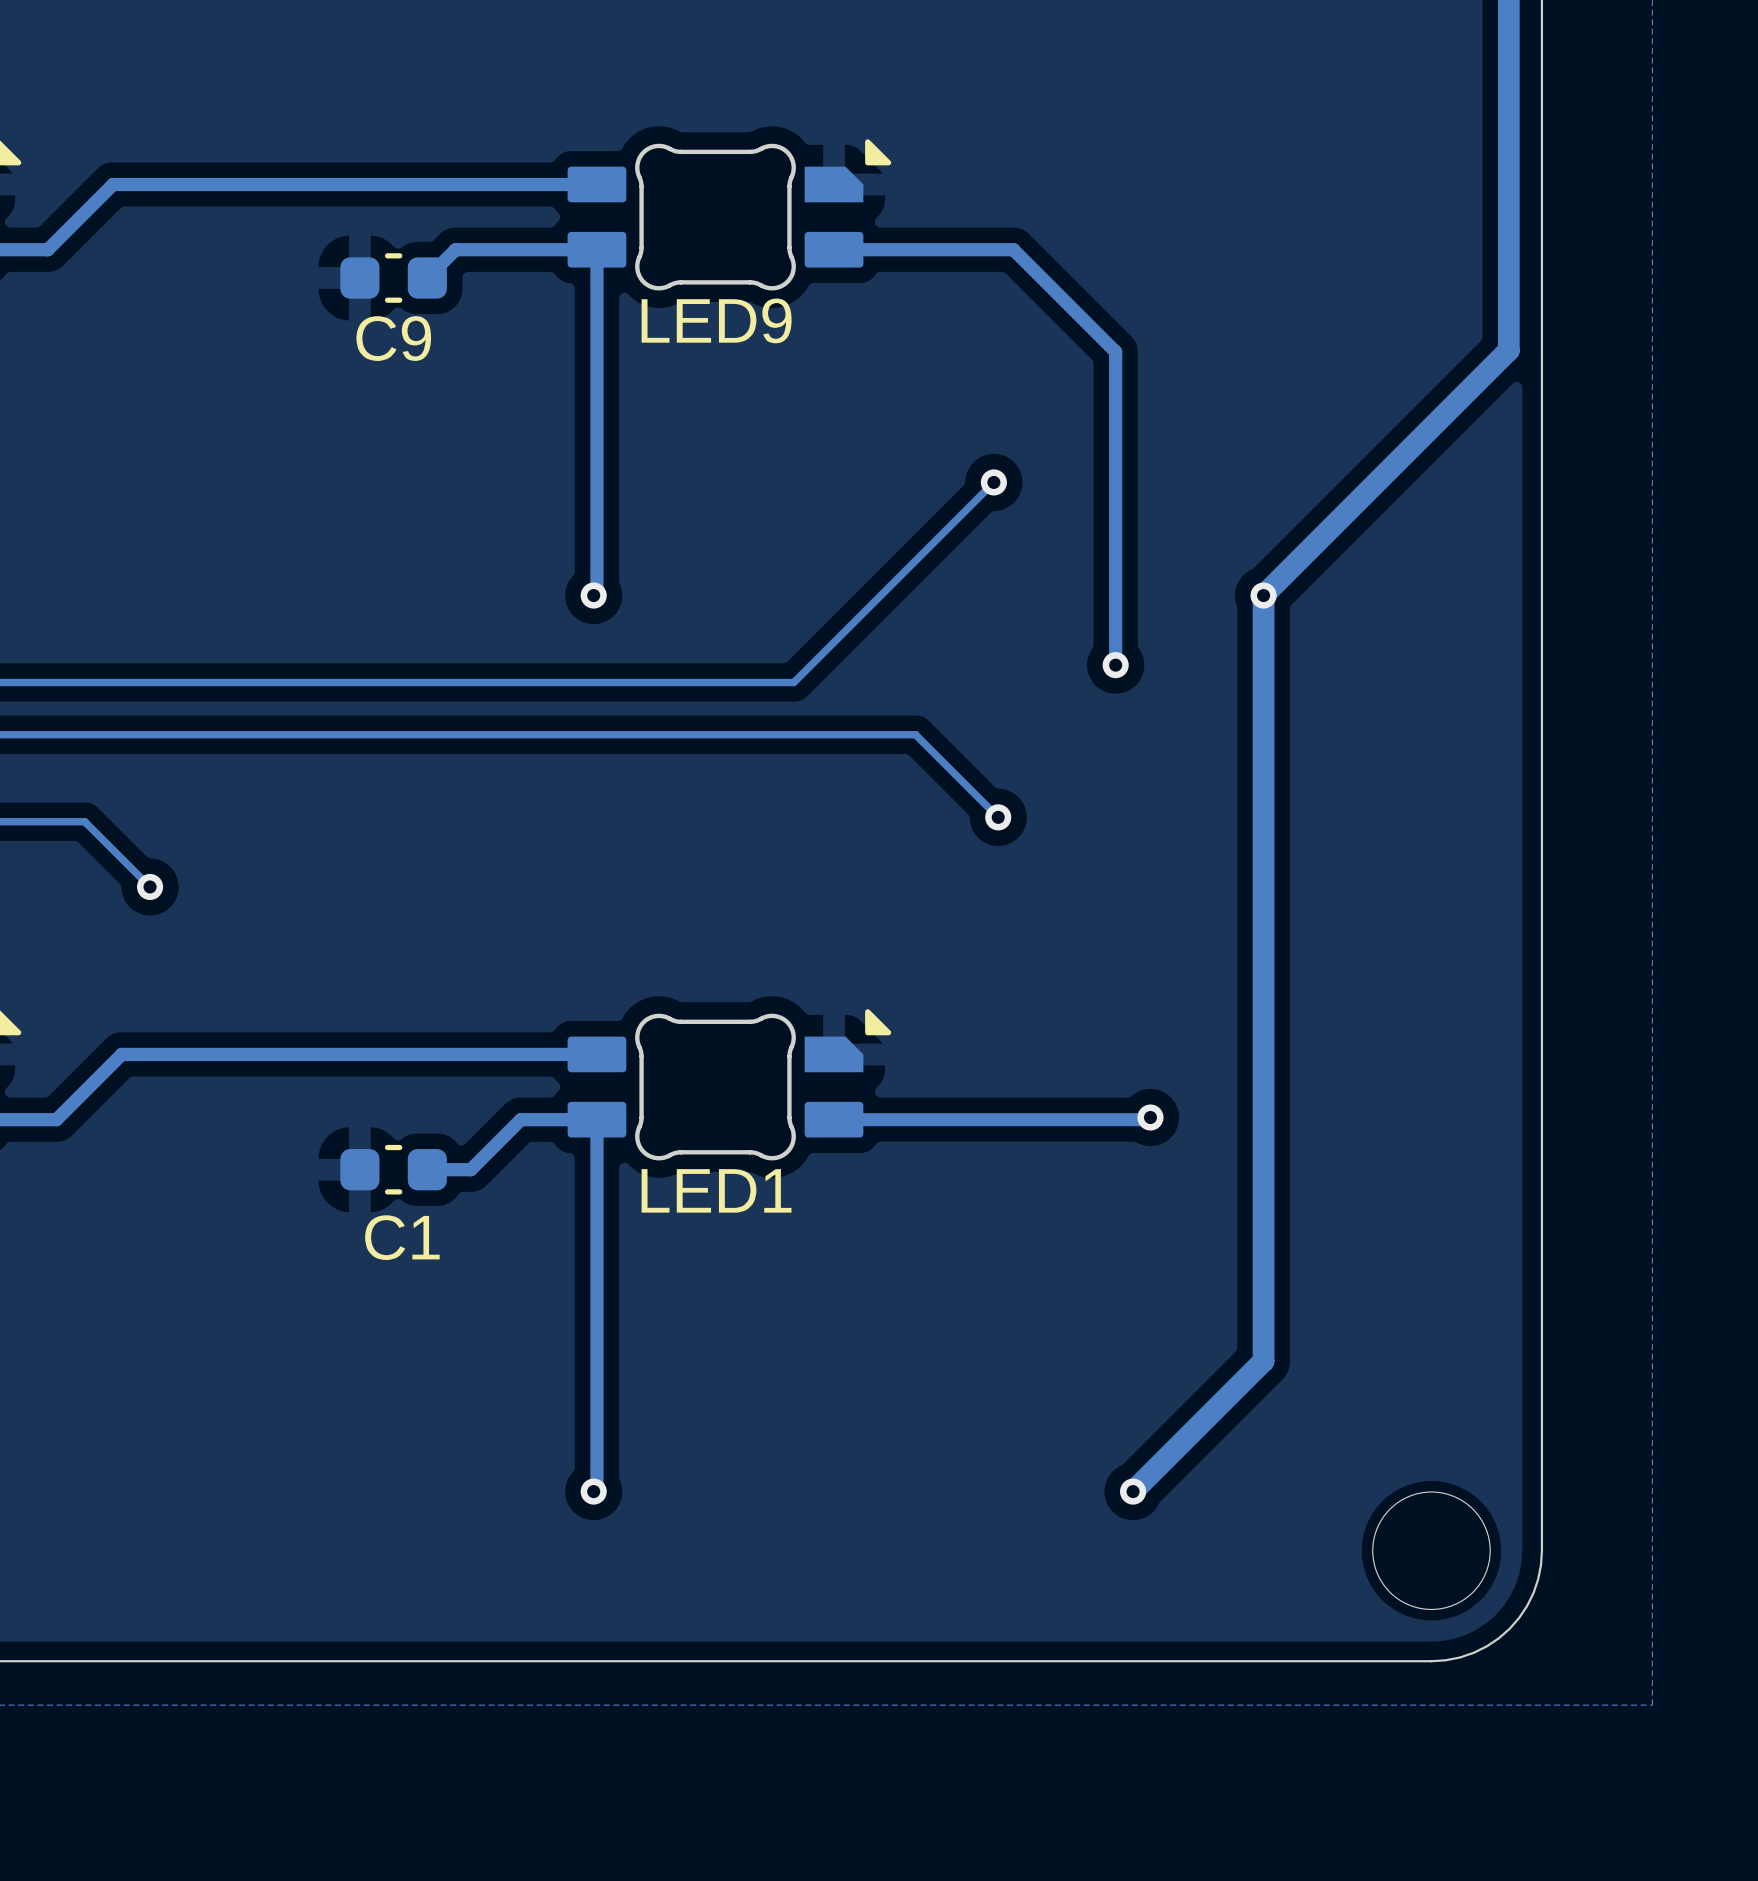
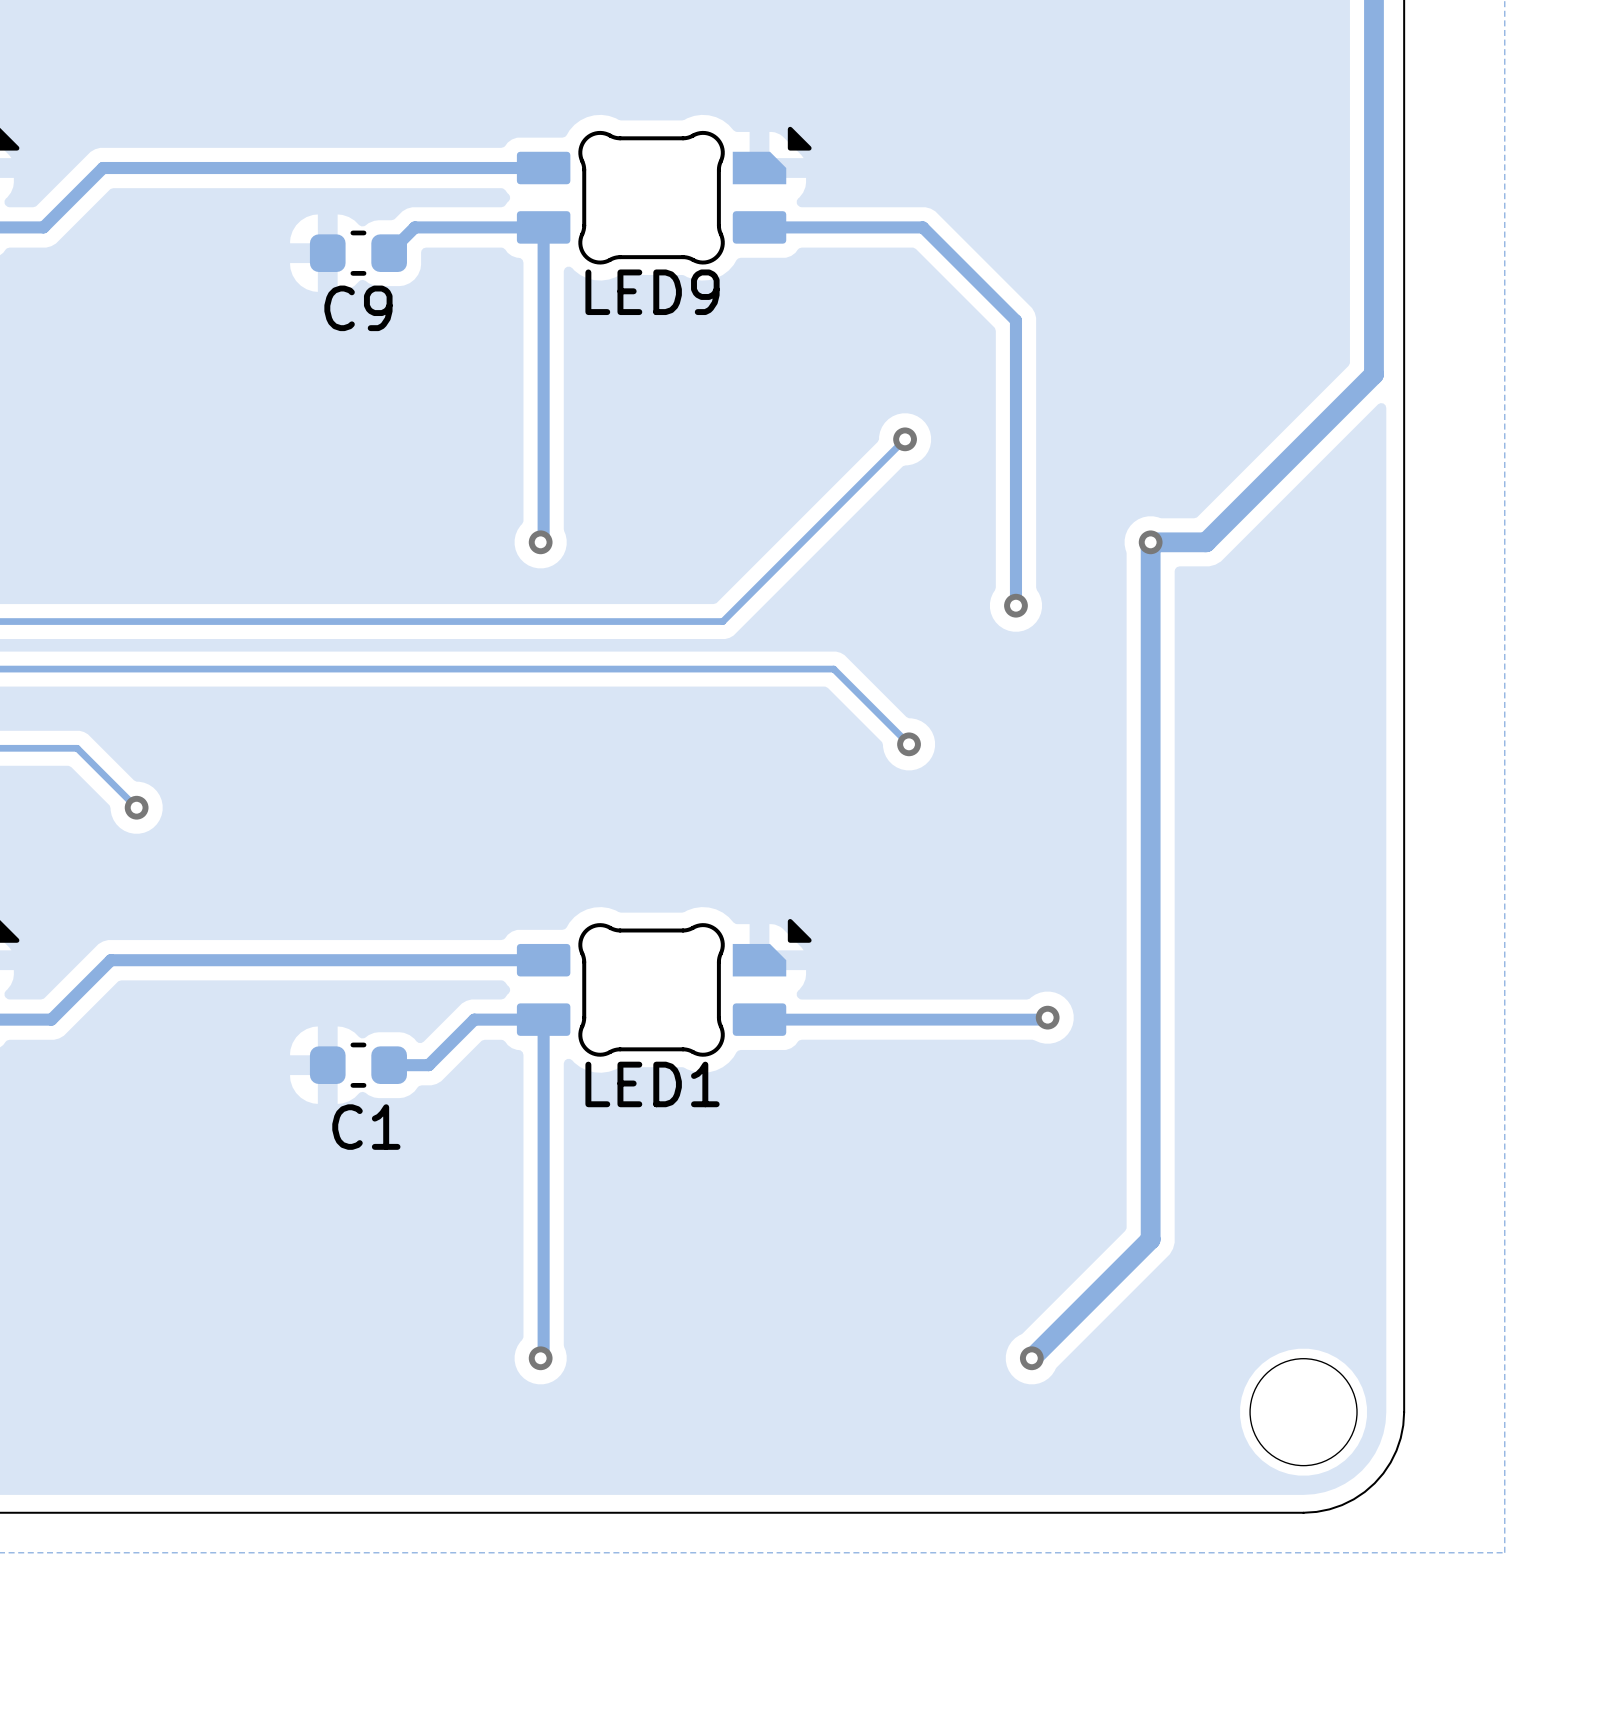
track: (1508, 350) (1263, 595) -> (1373, 319) (1373, 374) (1206, 542) (1150, 542)

